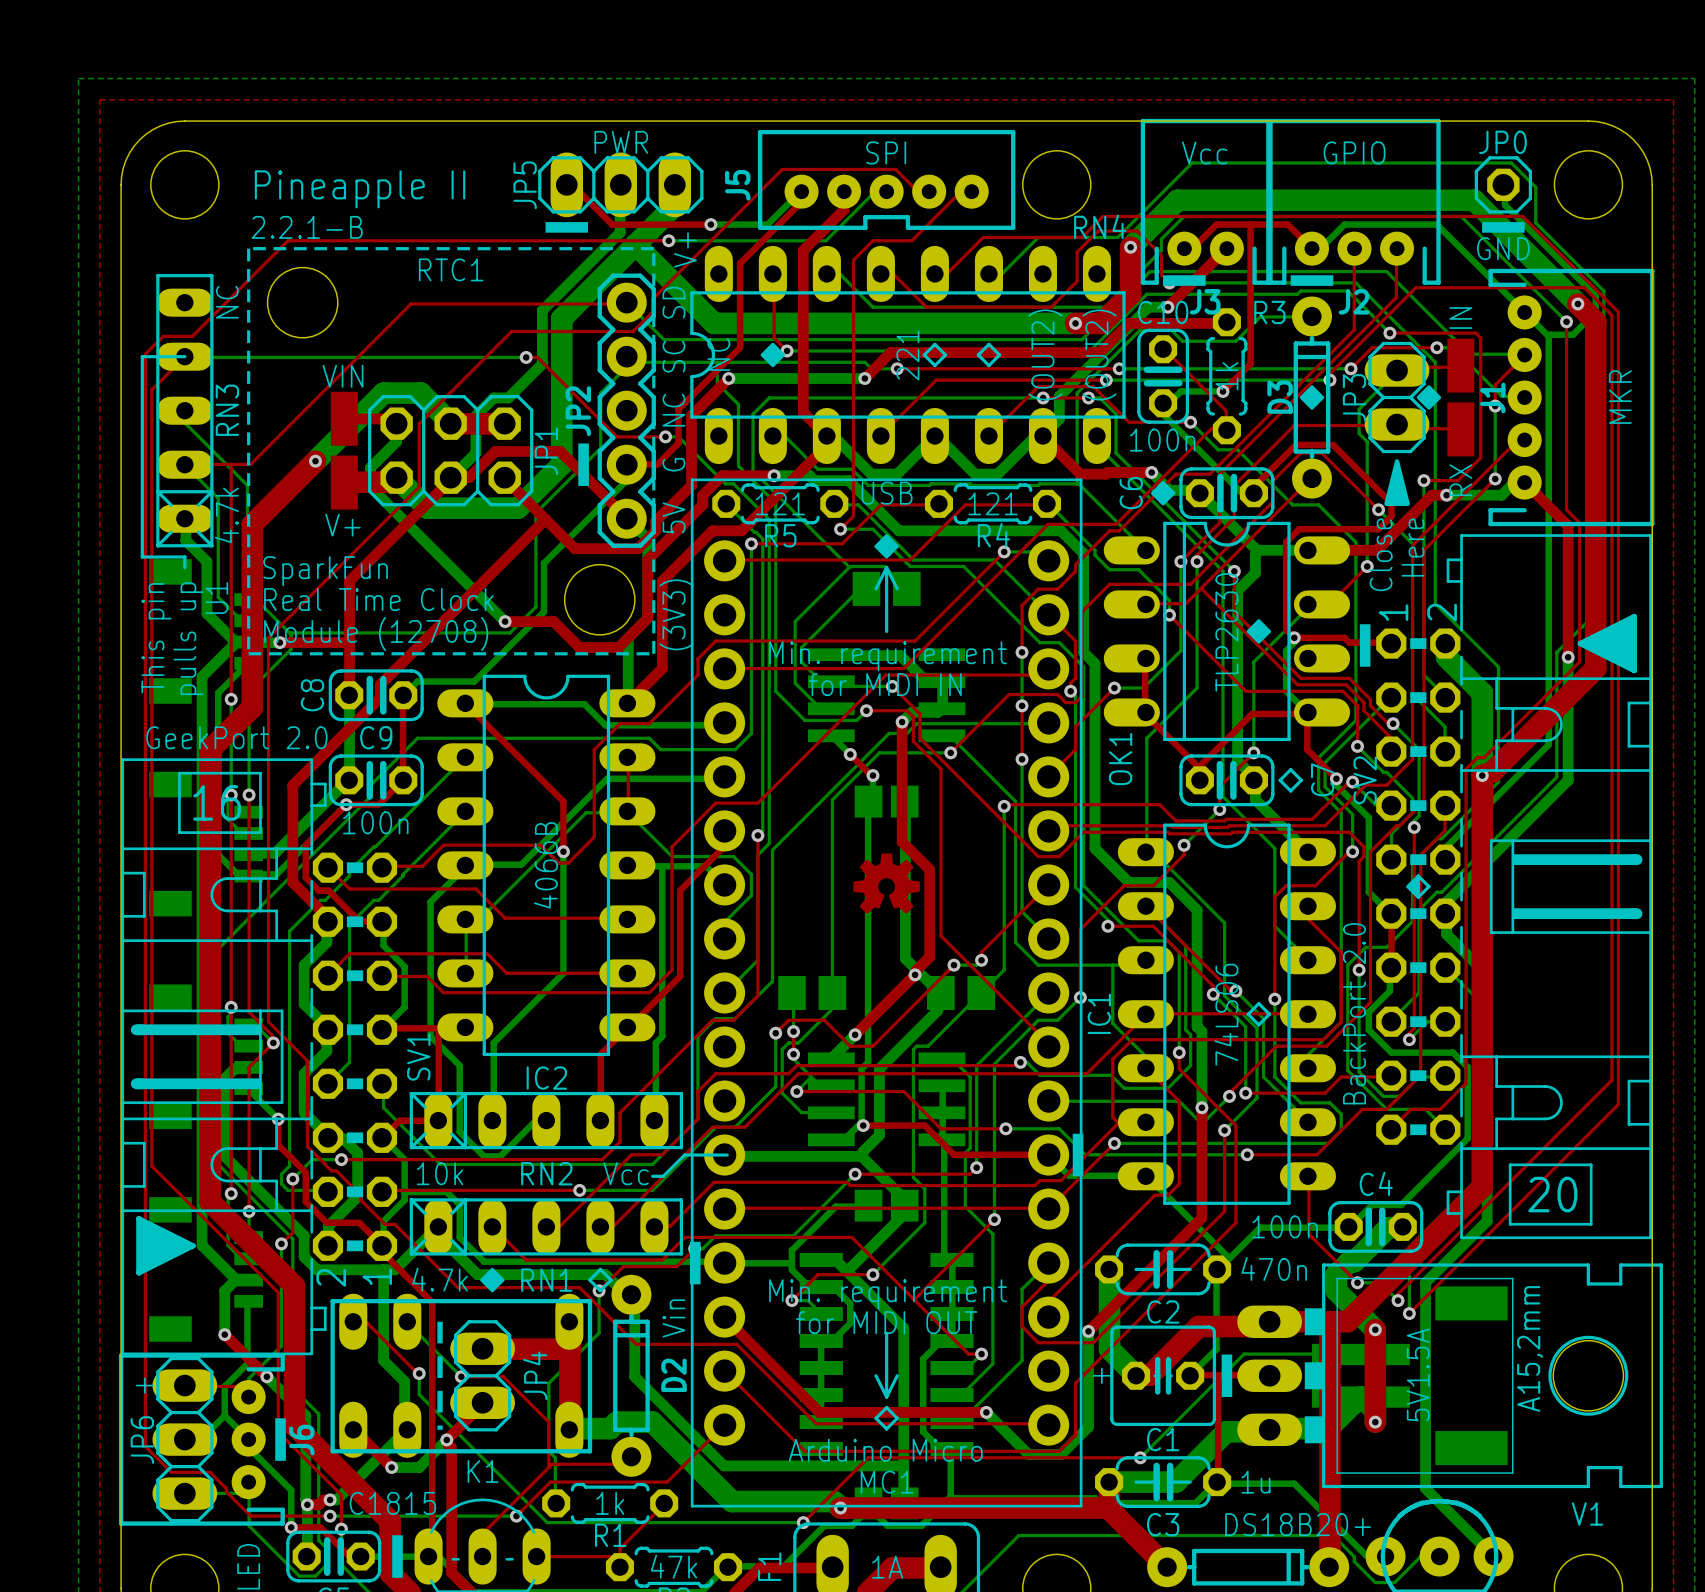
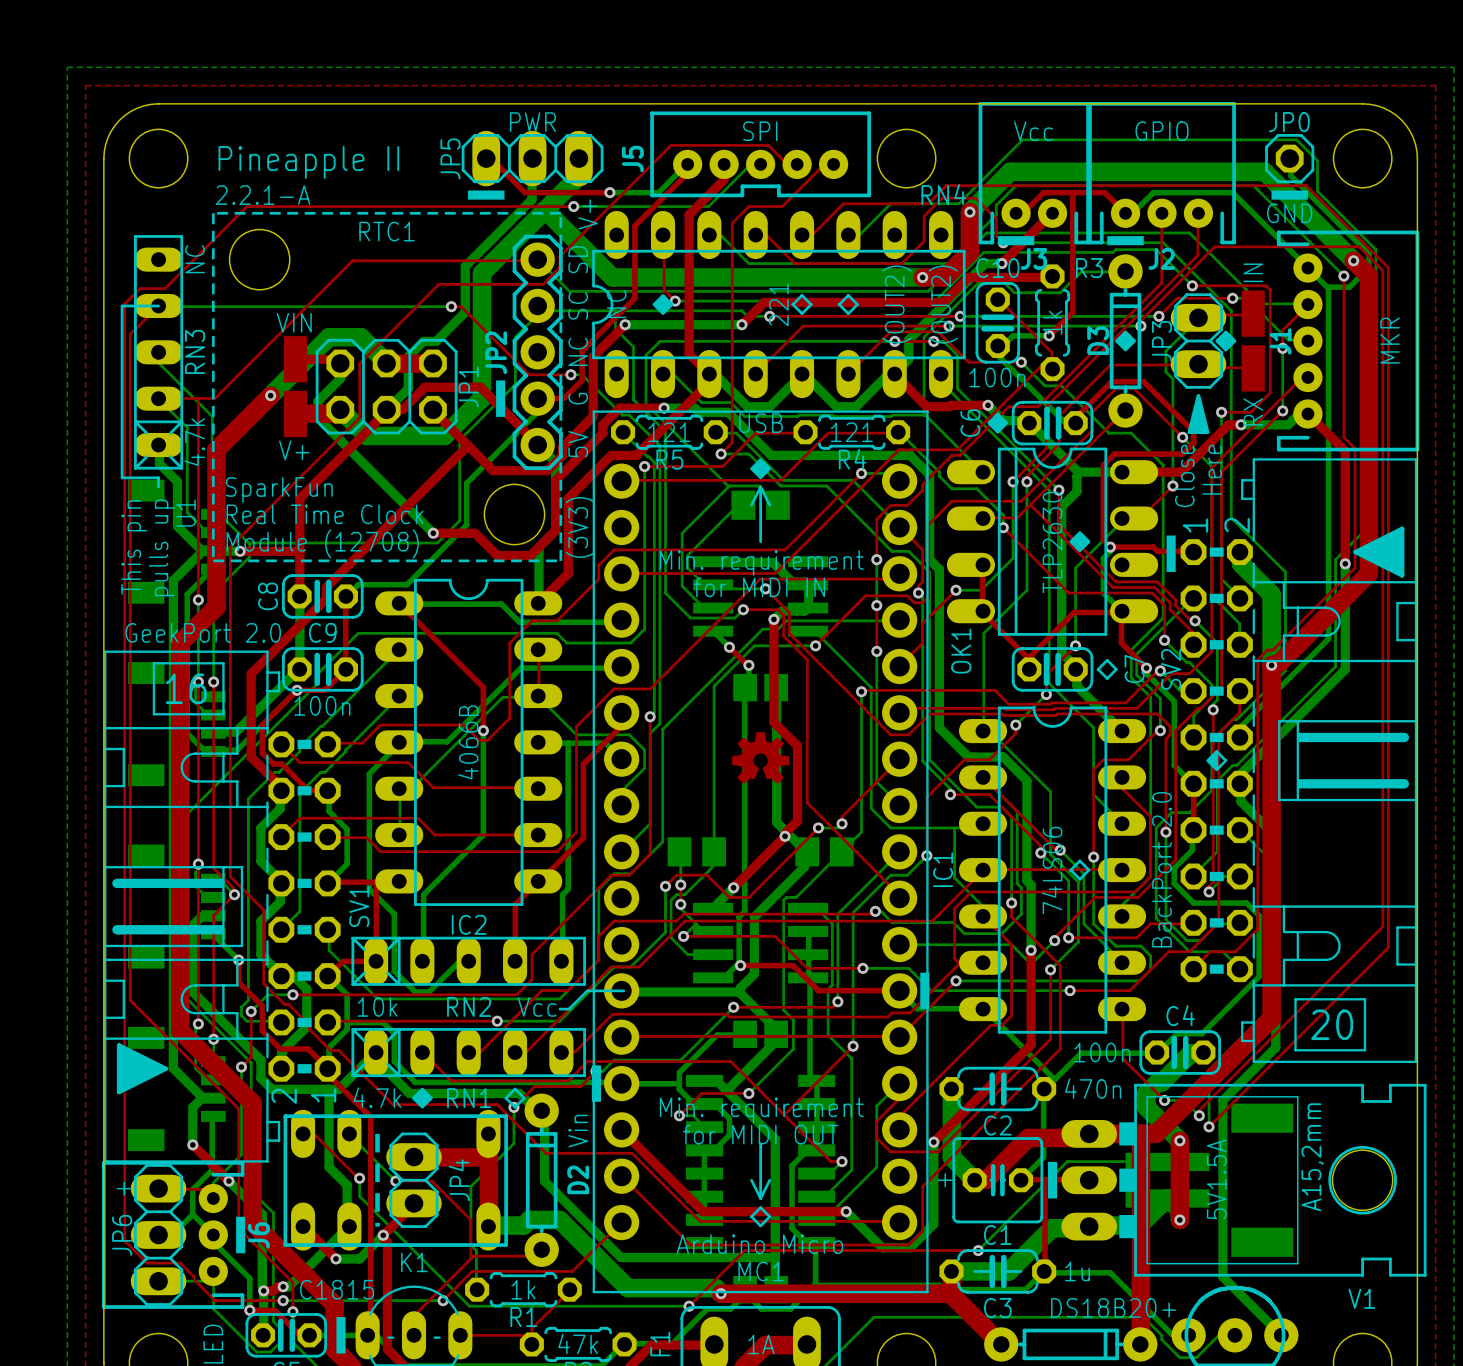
text: 2.2.1-B (307, 227) -> 2.2.1-A (263, 195)

